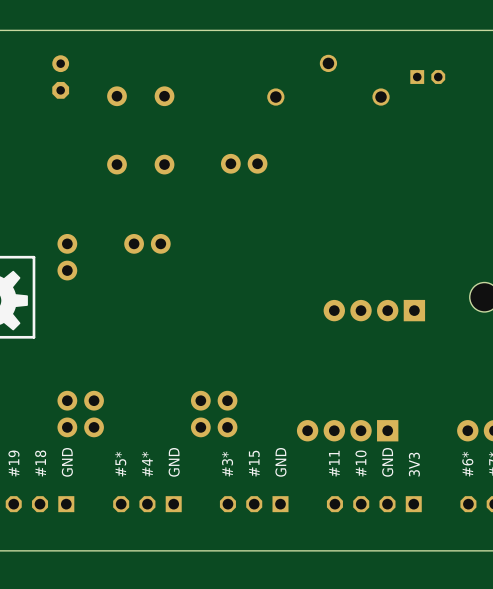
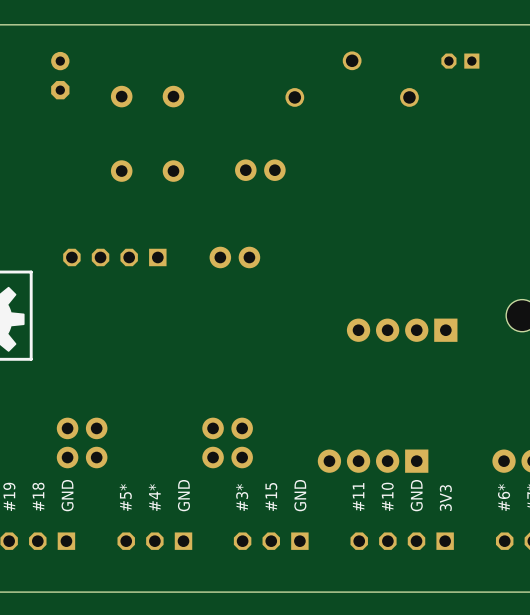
part rotation: 0° (427, 77) -> 180° (460, 61)
part: none -> (114, 257)
part position: (147, 243) -> (234, 257)
part: (67, 257) -> none

